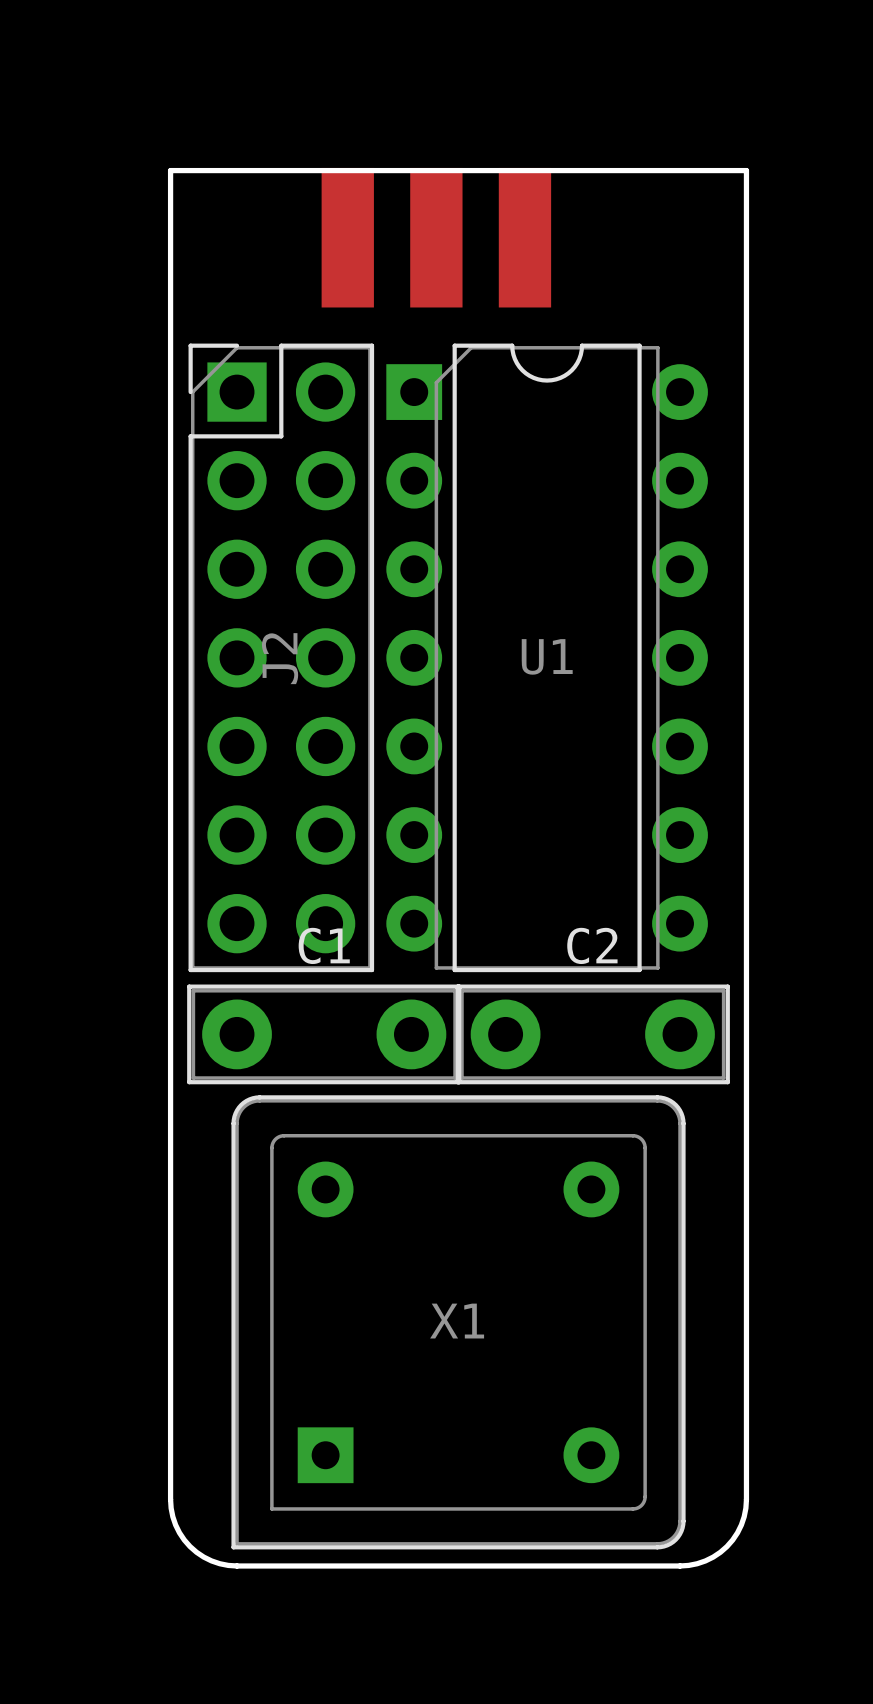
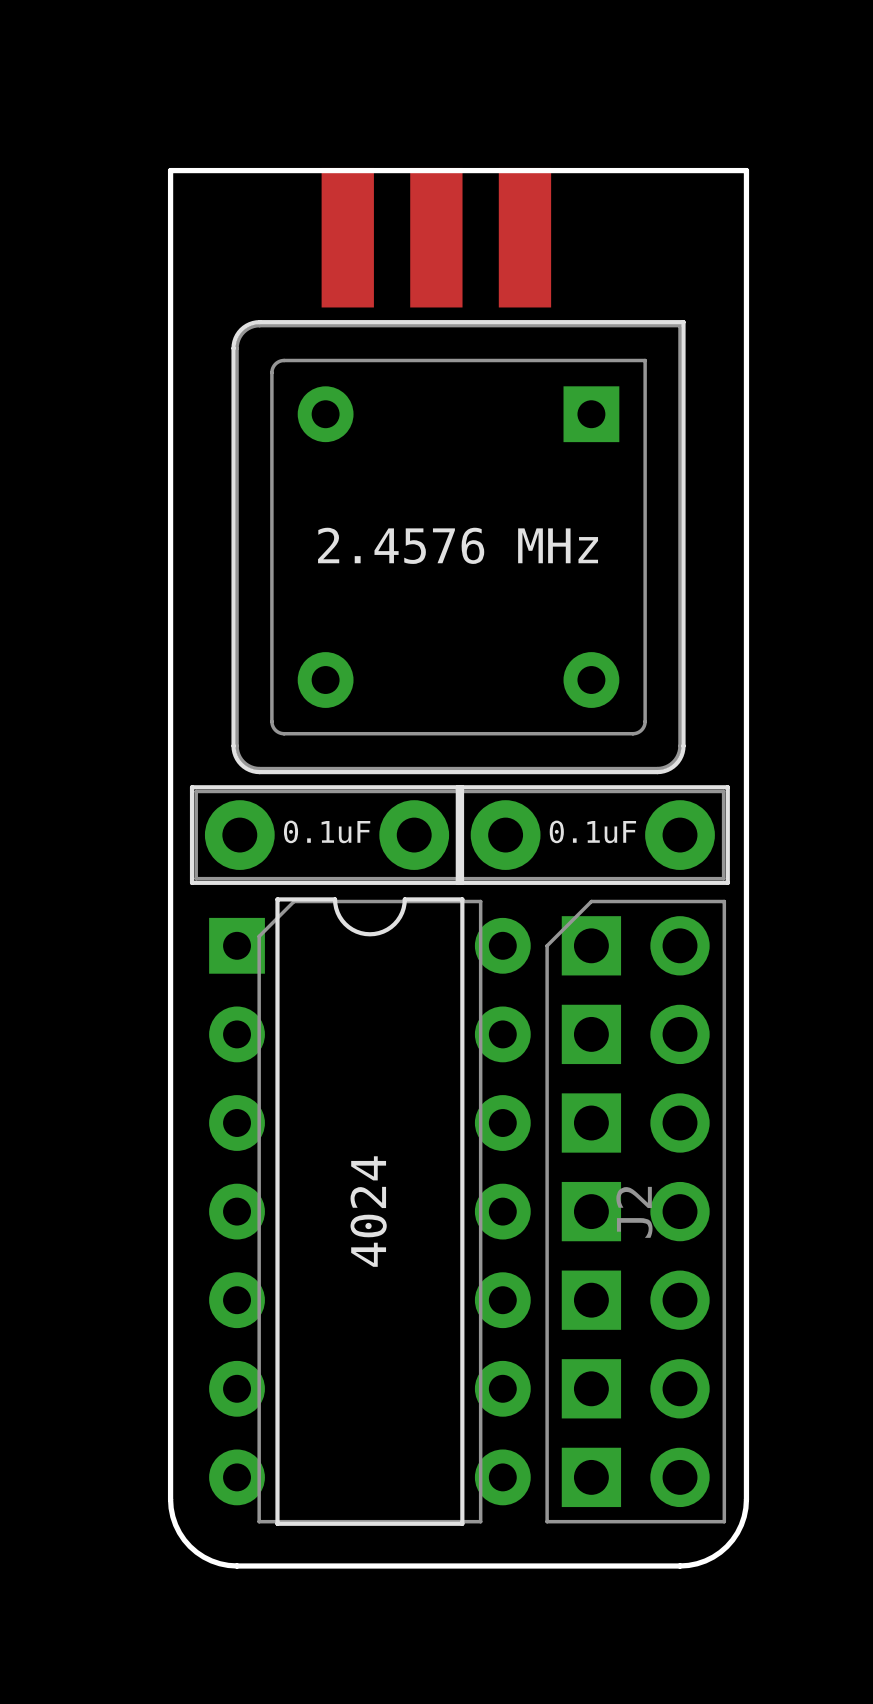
J2 footprint: [188, 343, 375, 973] -> [545, 899, 727, 1524]
part: none -> (458, 547)
U1: (547, 657) -> none
0.1uF: none -> (327, 835)
part: none -> (592, 835)
C1: (324, 1034) -> none
C2: (592, 1034) -> none
part: none -> (369, 1211)
X1: (458, 1322) -> none

